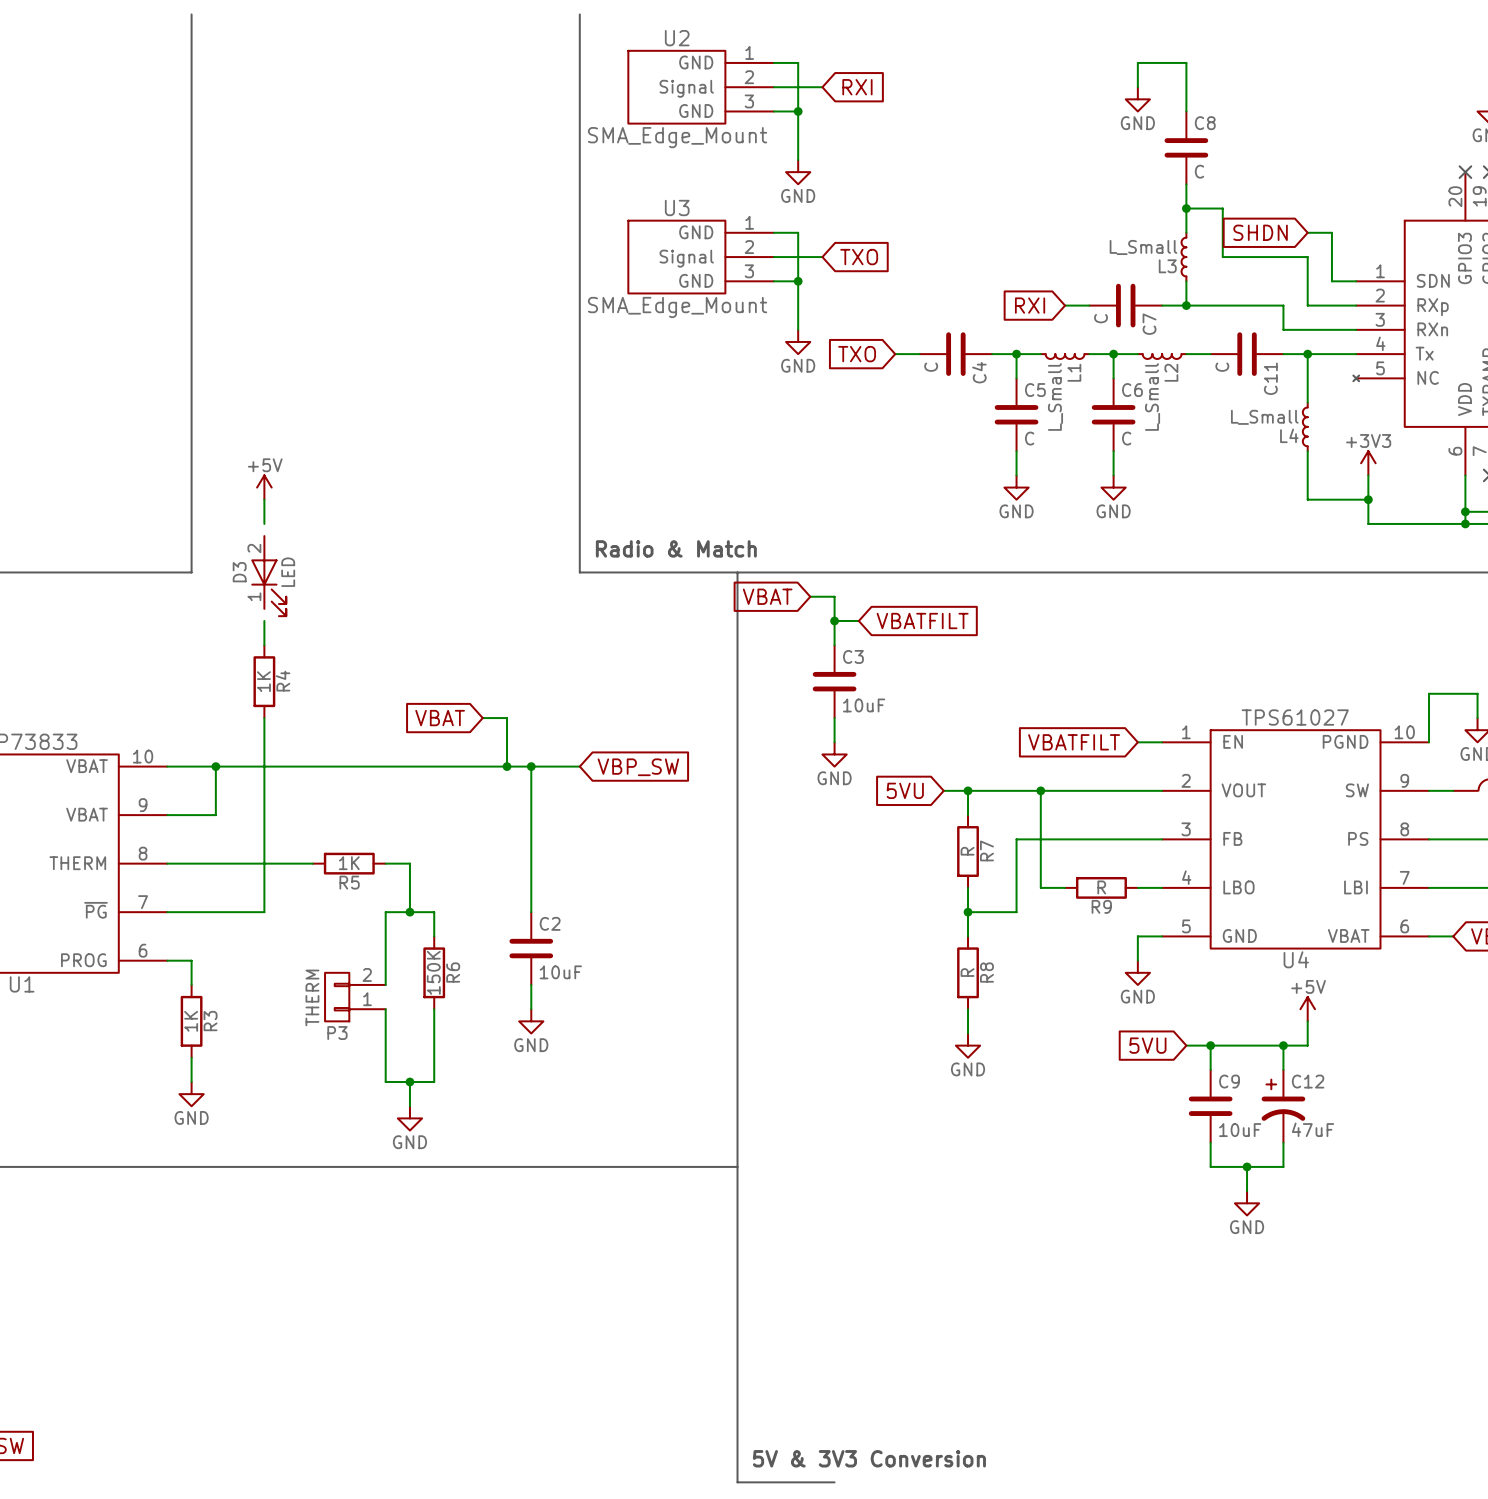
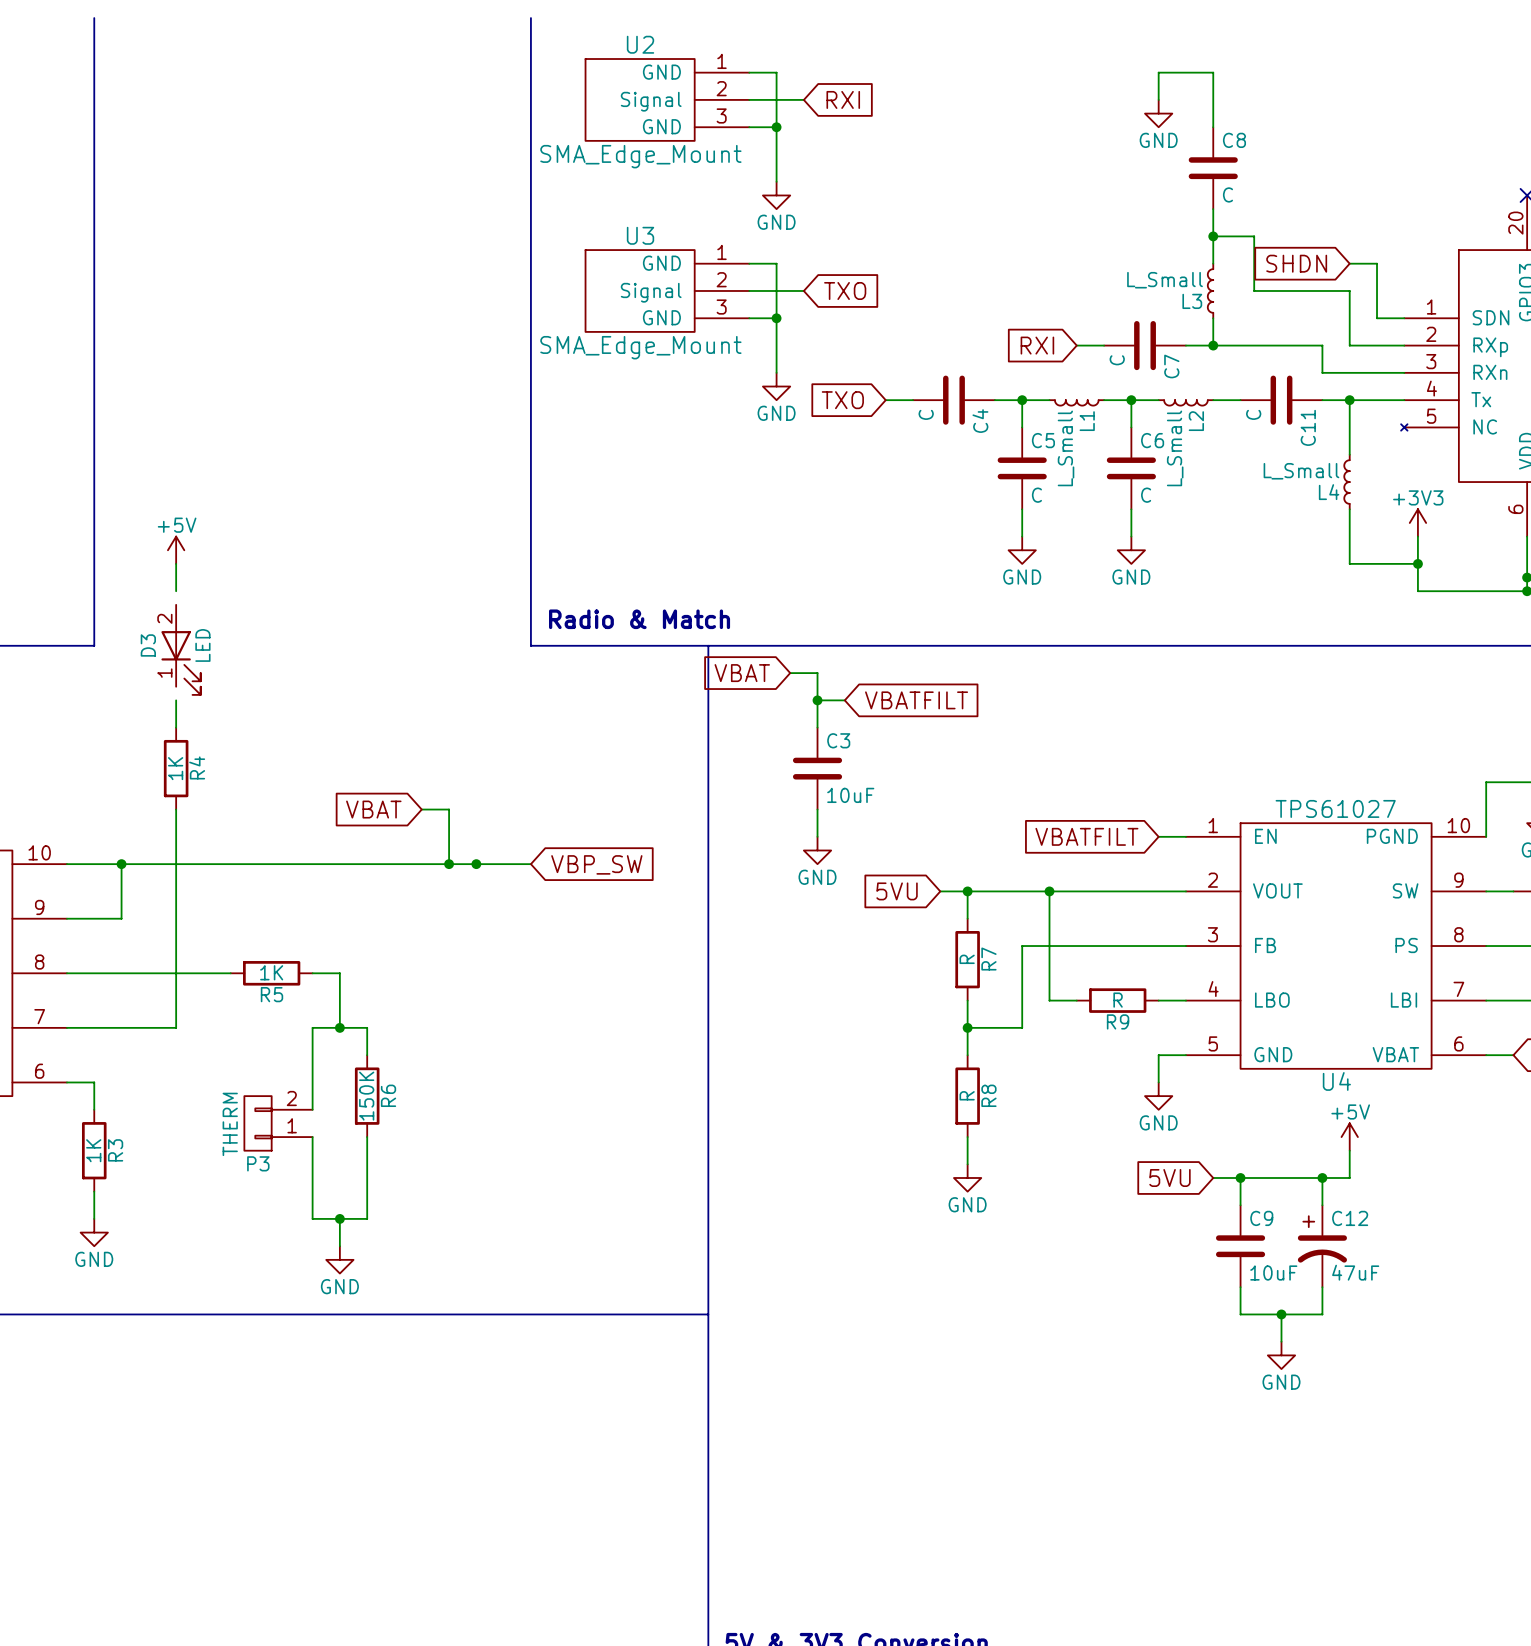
wire: (531, 766) (531, 912) -> none
C2: 10uF (531, 948) -> none
wire: (531, 984) (531, 1009) -> none
power symbol: GND (531, 1021) -> none

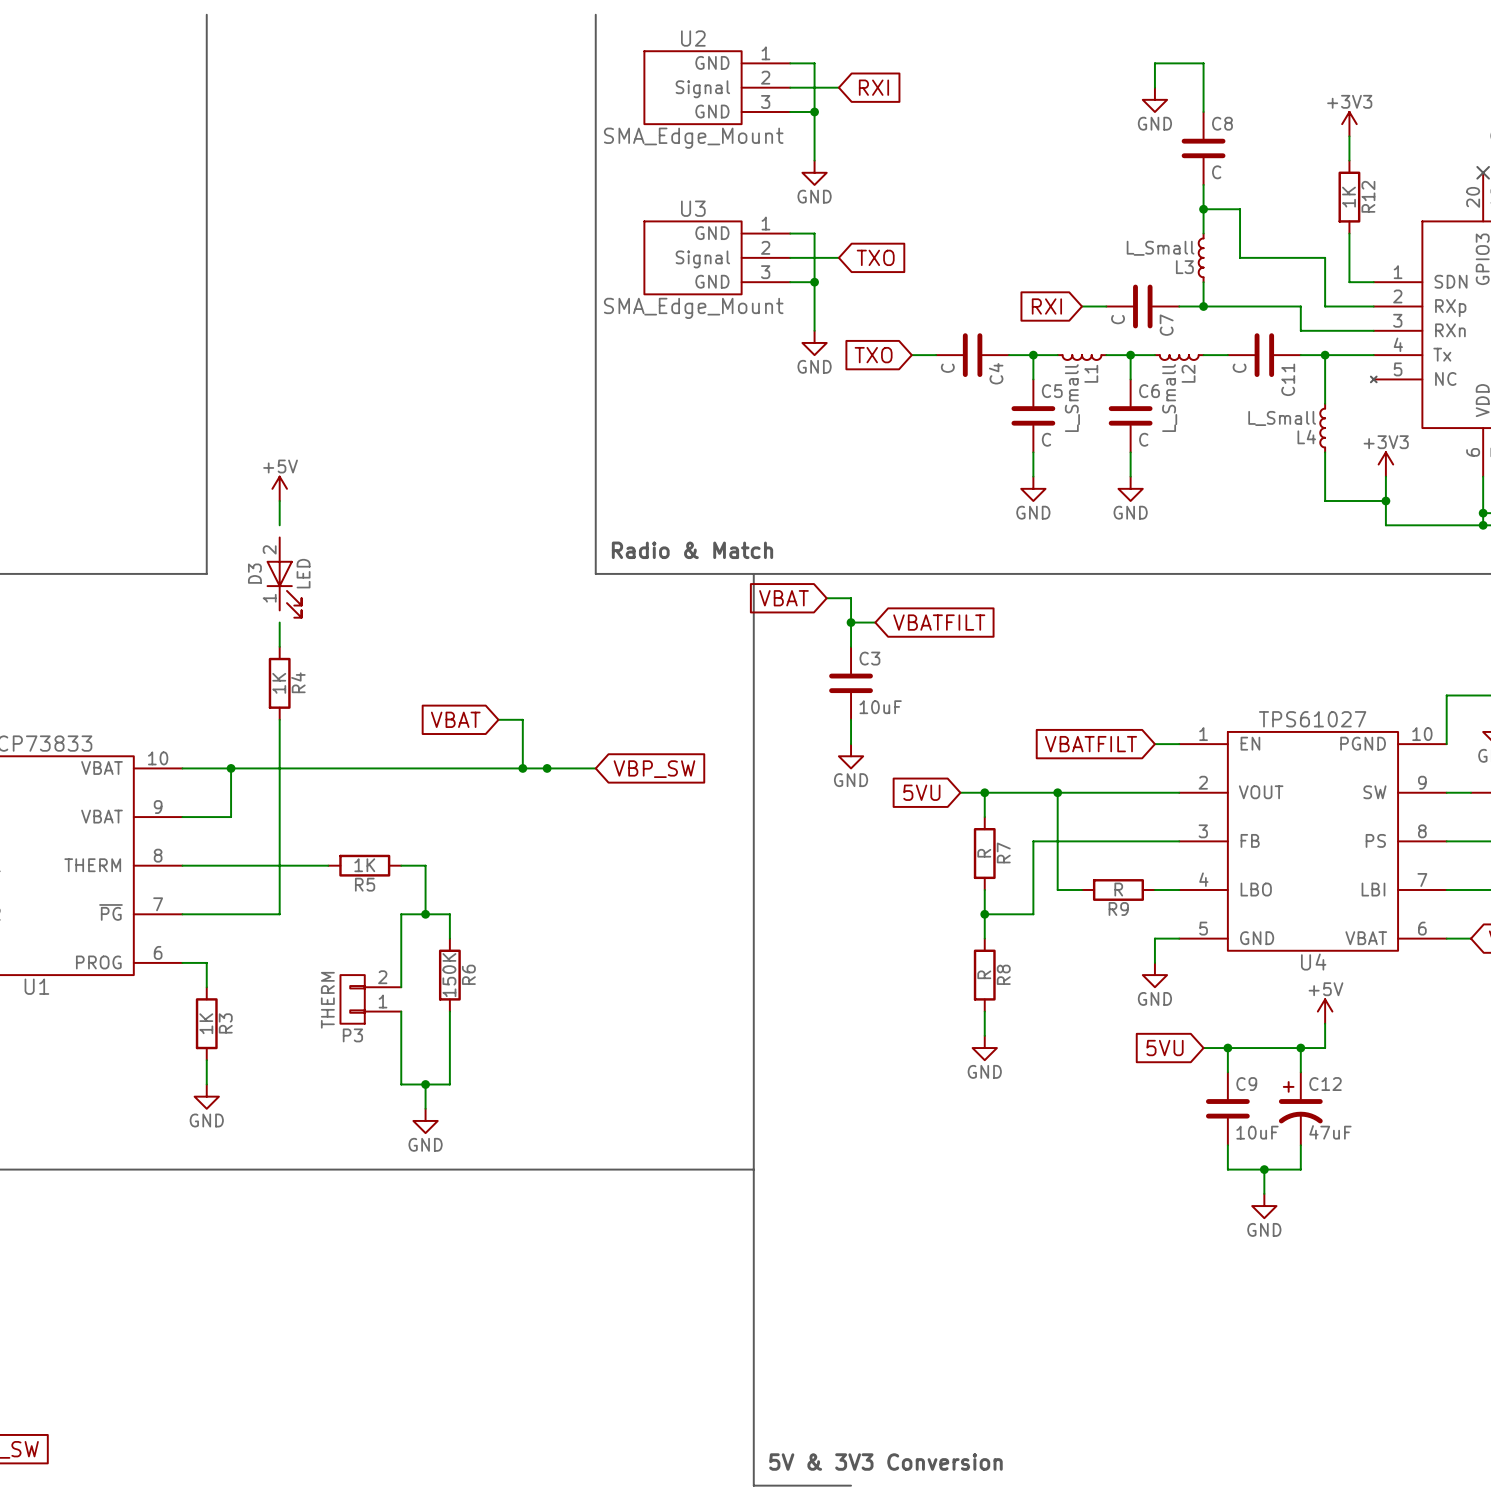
power symbol: none -> +3V3 (1349, 124)
wire: none -> (1349, 136) (1349, 160)
R12: none -> 1K (1349, 197)
global label: SHDN (1296, 263) -> none
wire: (1349, 263) (1377, 263) -> none

